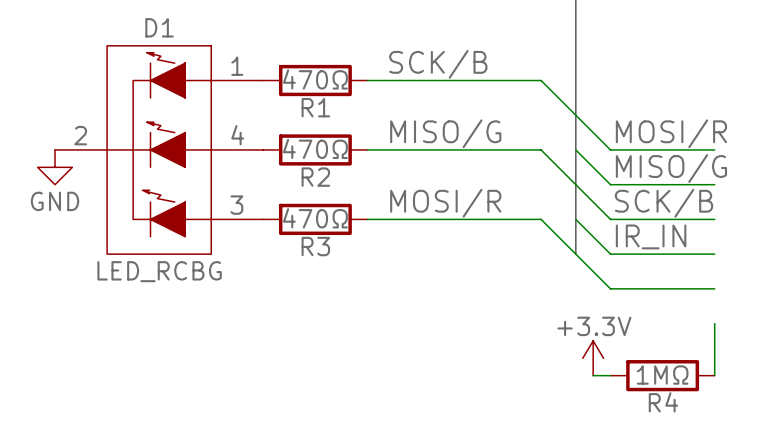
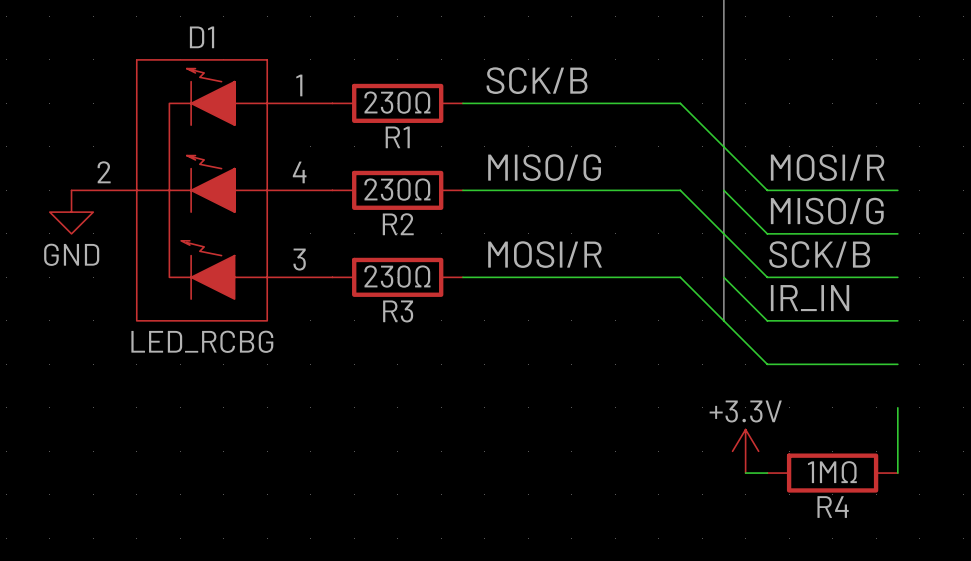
R1 value: 470Ω (315, 79) -> 230Ω (397, 102)
R2 value: 470Ω (315, 148) -> 230Ω (397, 189)
R3 value: 470Ω (315, 218) -> 230Ω (397, 276)

